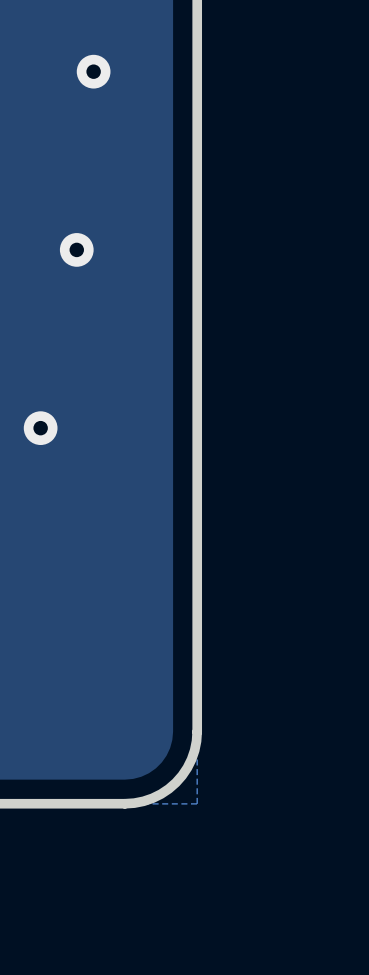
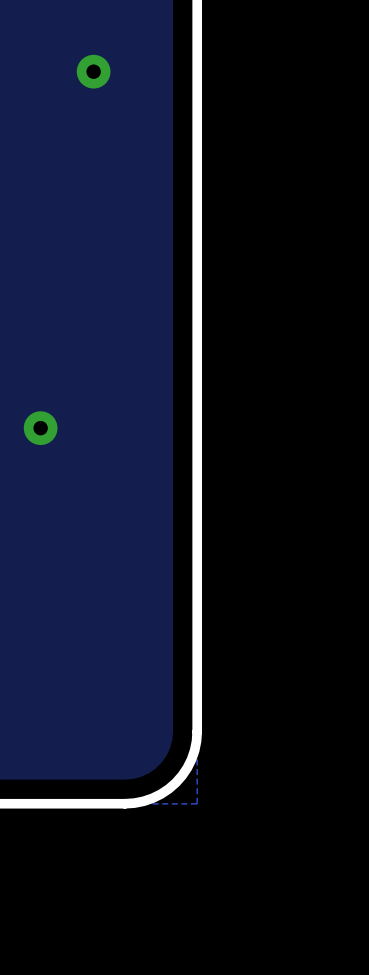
via: (76, 249) -> none

